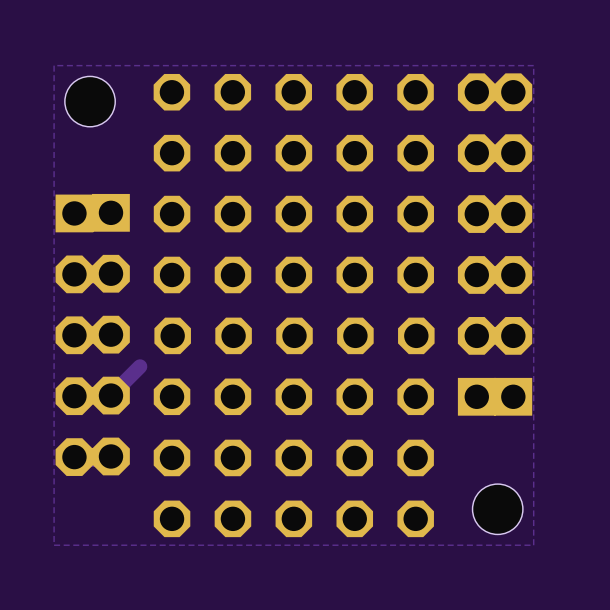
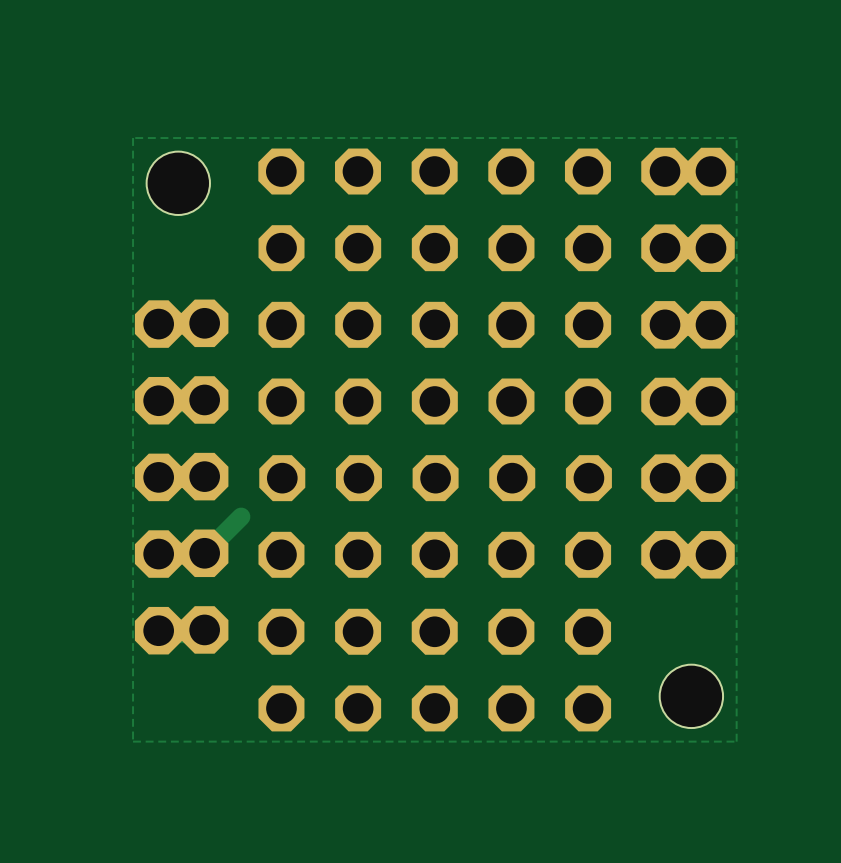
part footprint: [457, 73, 496, 416] -> [641, 147, 689, 579]
part footprint: [494, 73, 533, 416] -> [687, 147, 735, 579]
part footprint: [92, 193, 130, 476] -> [180, 299, 229, 654]
part footprint: [55, 194, 94, 476] -> [134, 300, 183, 655]

